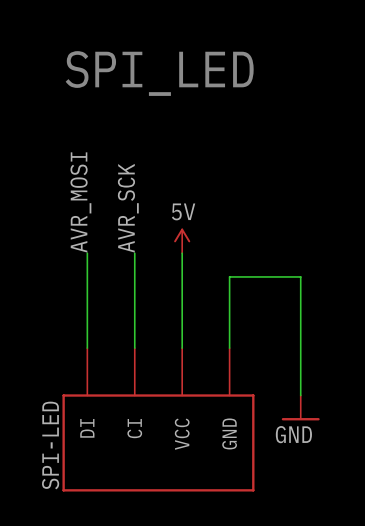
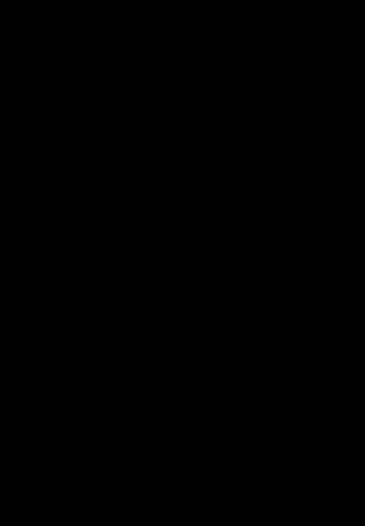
text: SPI_LED (159, 73) -> none
label: AVR_MOSI (80, 202) -> none
label: AVR_SCK (128, 208) -> none
power symbol: 5V (182, 240) -> none
wire: (87, 253) (87, 348) -> none
wire: (134, 253) (134, 348) -> none
wire: (182, 253) (182, 348) -> none
wire: (229, 348) (229, 276) (300, 276) (300, 395) -> none
power symbol: GND (300, 407) -> none
SPI-LED: (158, 419) -> none

